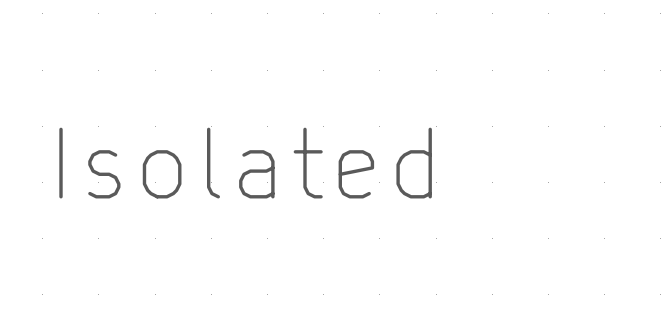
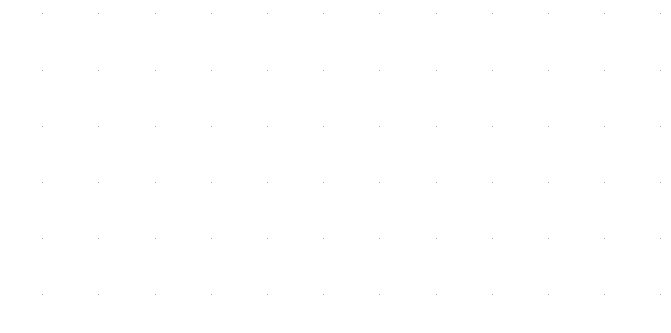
text: Isolated (245, 163) -> none

